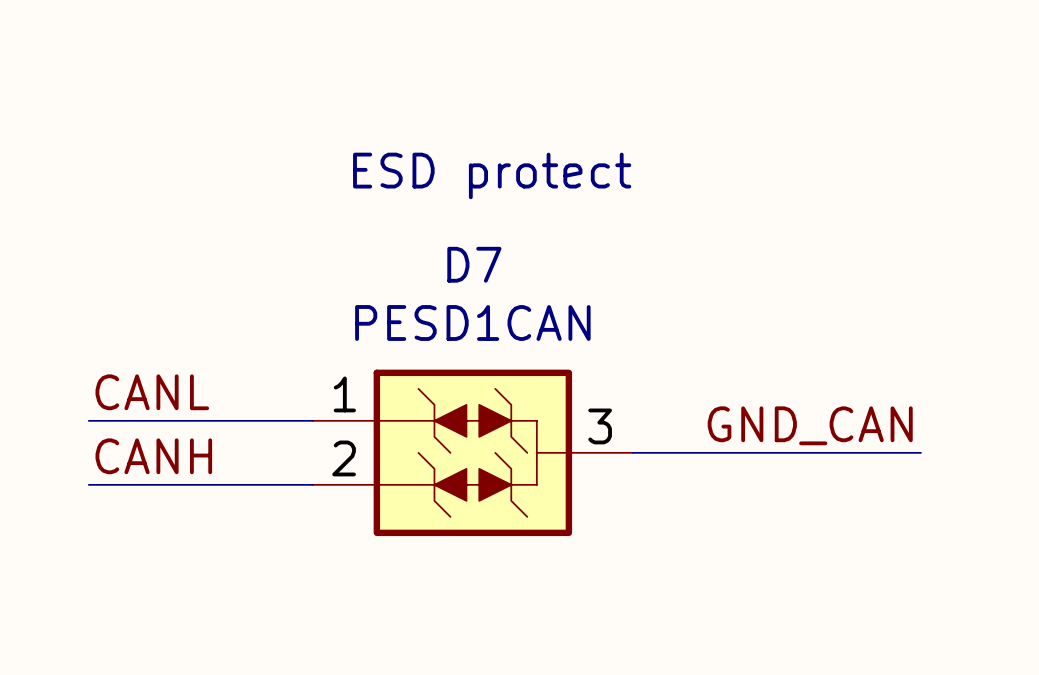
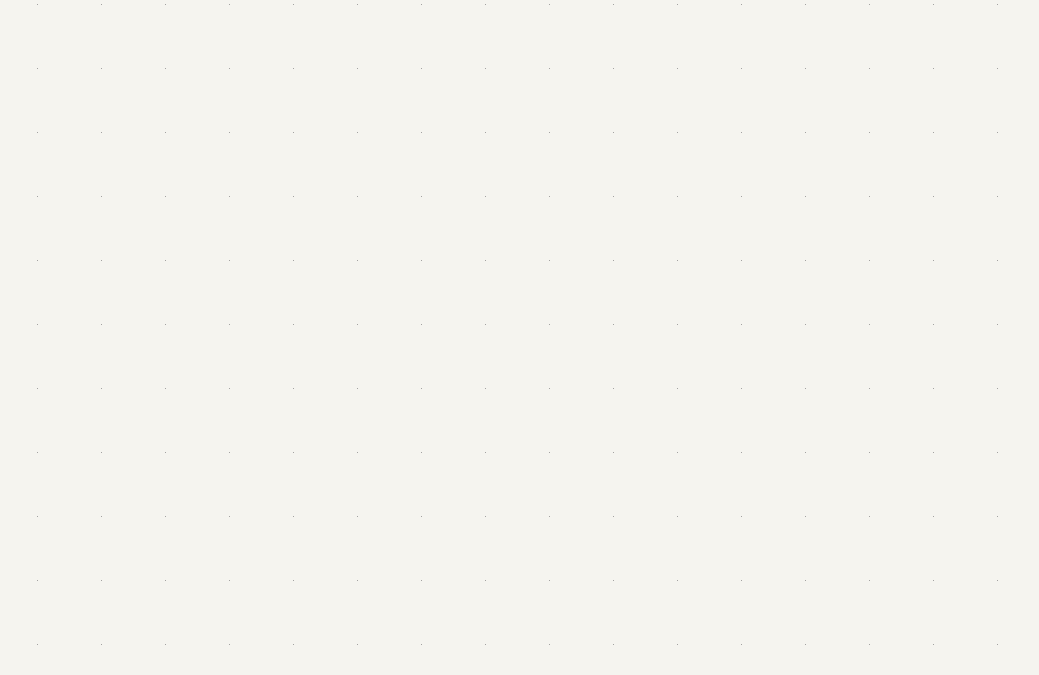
text: ESD protect (492, 175) -> none
label: CANL (152, 392) -> none
wire: (88, 420) (312, 420) -> none
label: GND_CAN (810, 425) -> none
D7: PESD1CAN (472, 452) -> none
wire: (632, 452) (920, 452) -> none
label: CANH (153, 456) -> none
wire: (88, 484) (312, 484) -> none

